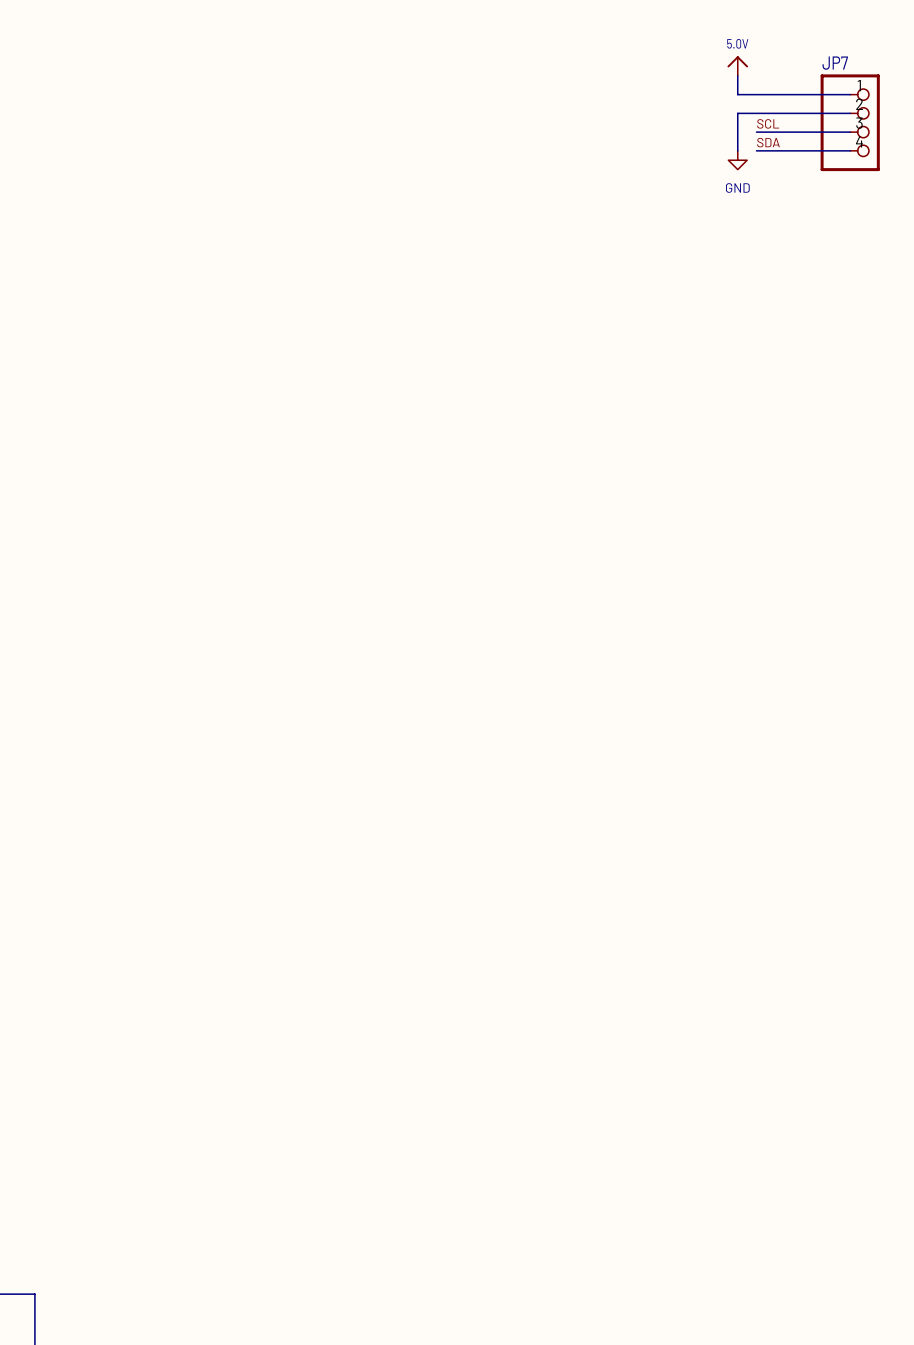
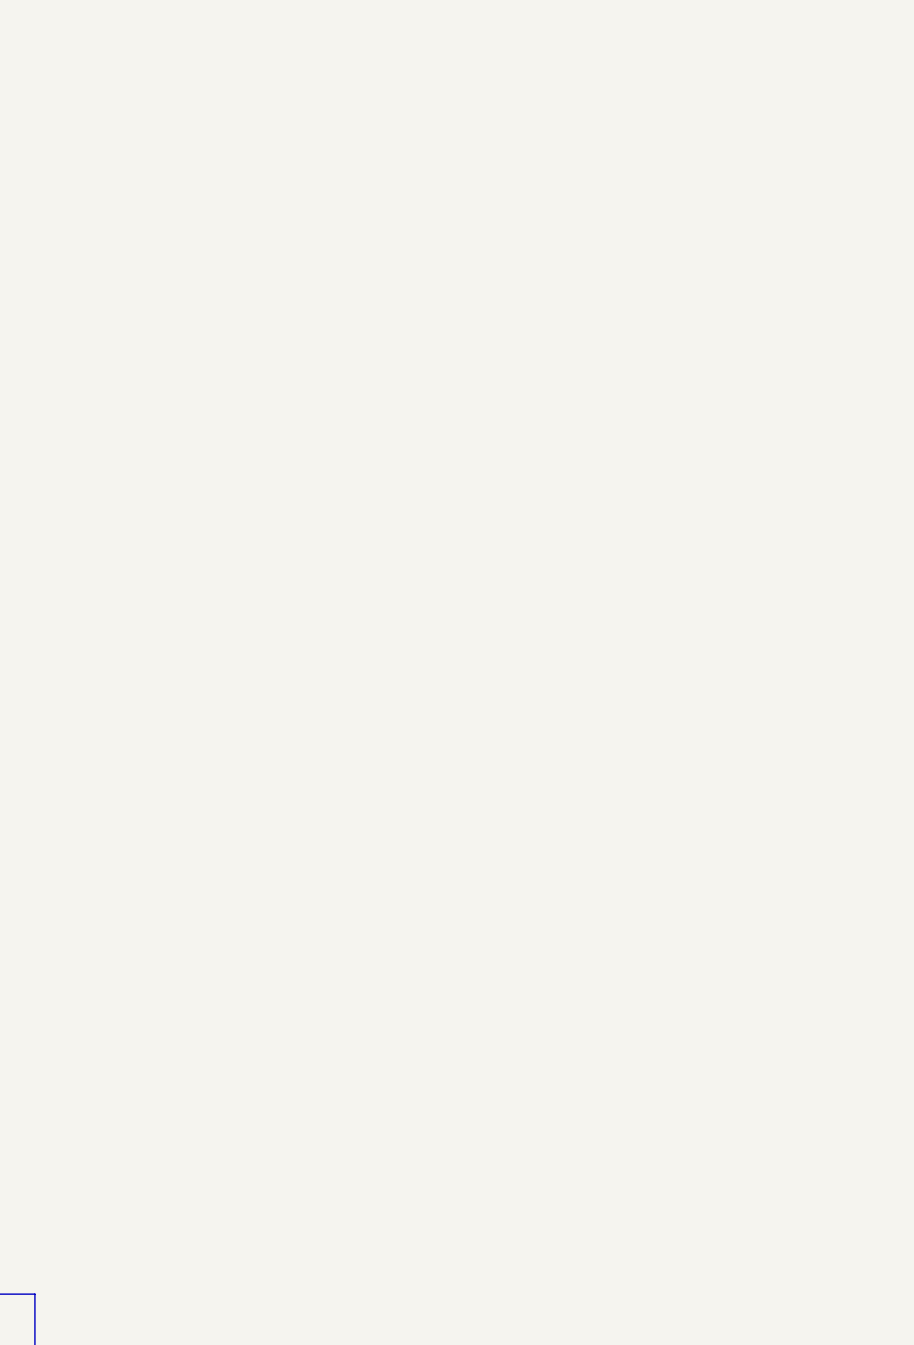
power symbol: 5.0V (737, 66) -> none
wire: (737, 75) (737, 94) (850, 94) -> none
wire: (850, 113) (737, 113) (737, 150) -> none
JP7: (850, 122) -> none
label: SCL (768, 123) -> none
wire: (756, 132) (850, 132) -> none
label: SDA (768, 142) -> none
wire: (756, 150) (850, 150) -> none
power symbol: GND (737, 160) -> none

